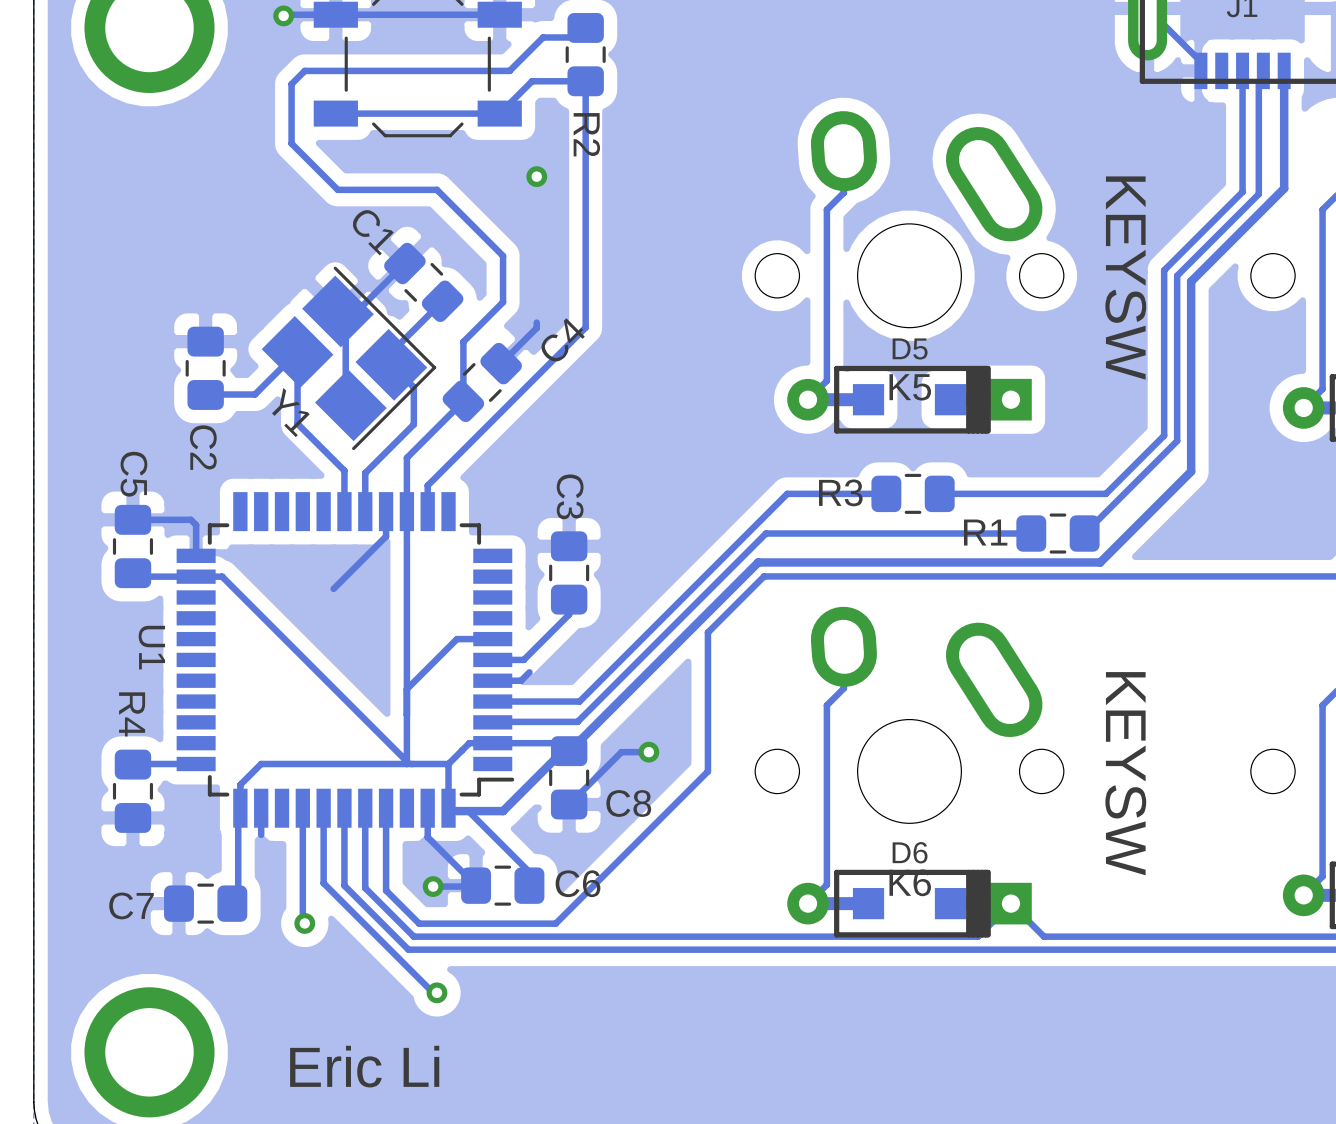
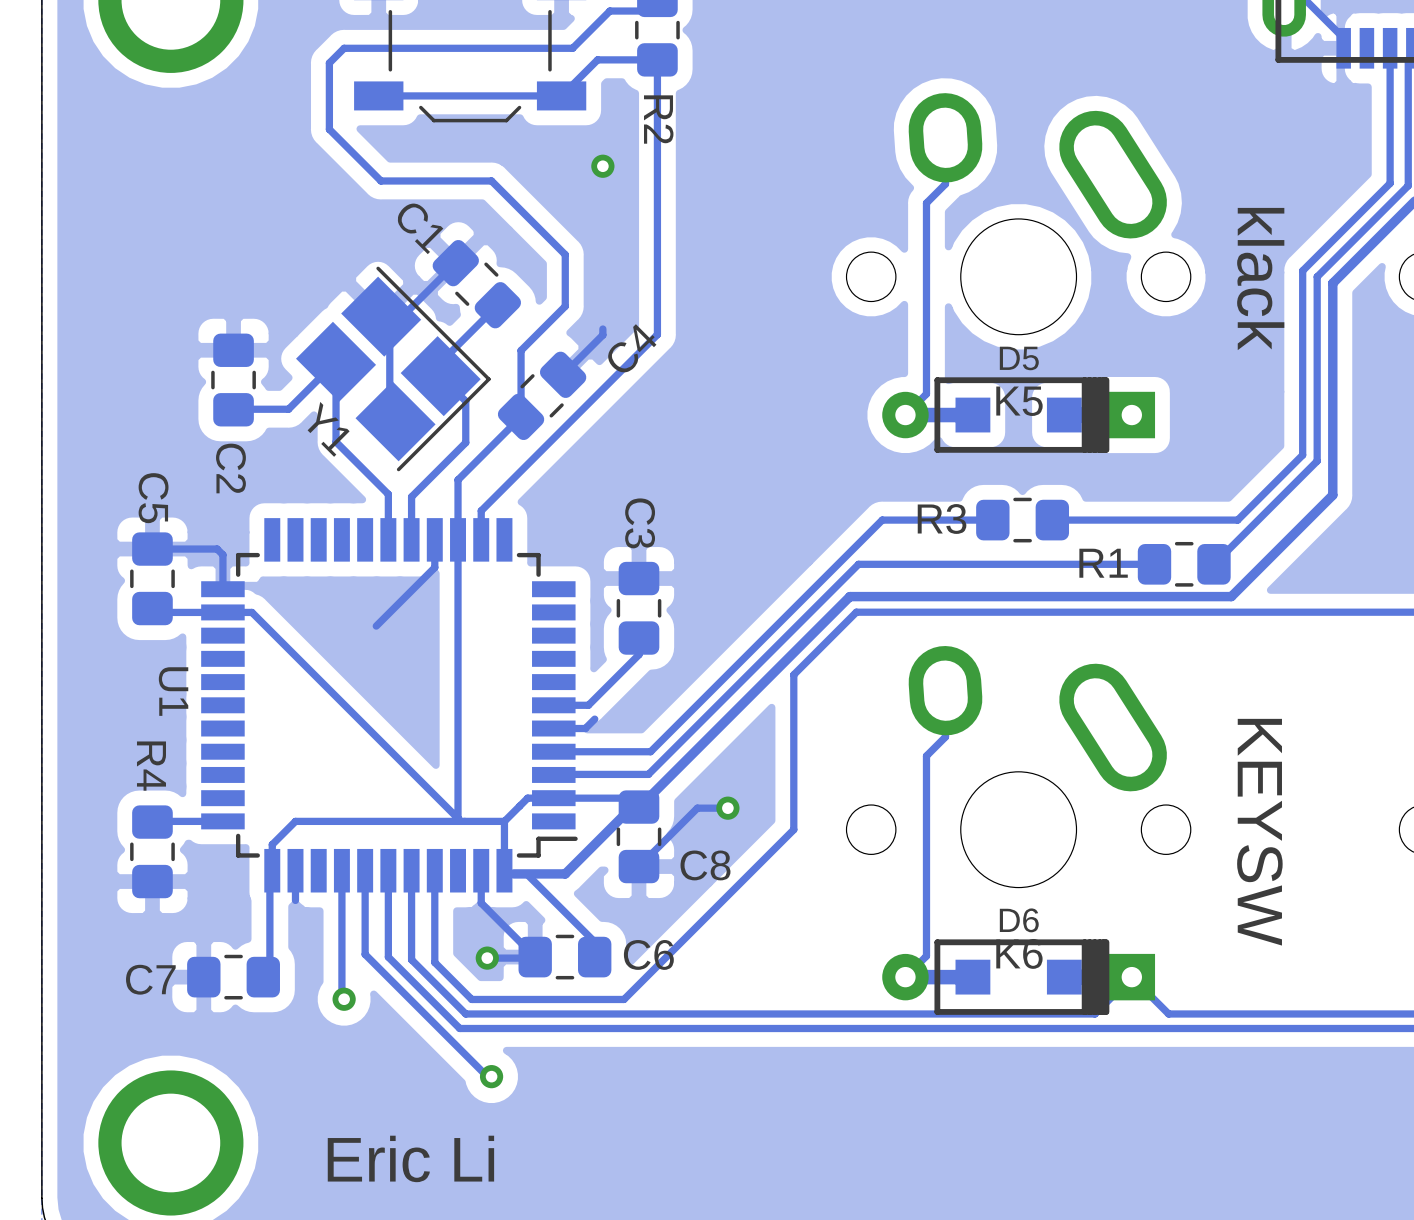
K5 value: KEYSW (1125, 278) -> klack (1260, 279)
track: (492, 639) (456, 639) (406, 689) -> none

